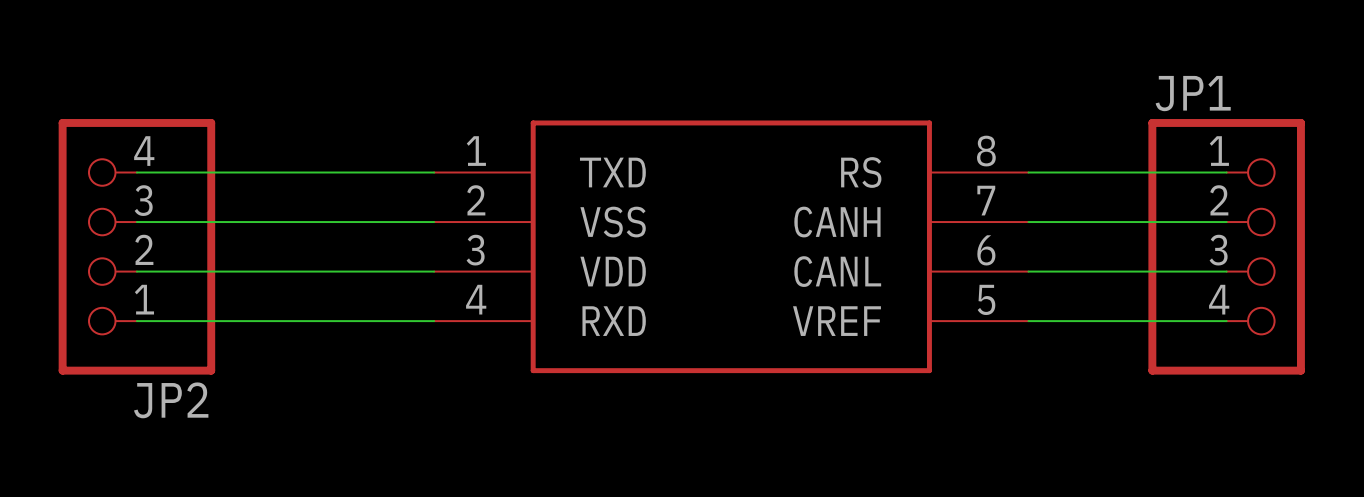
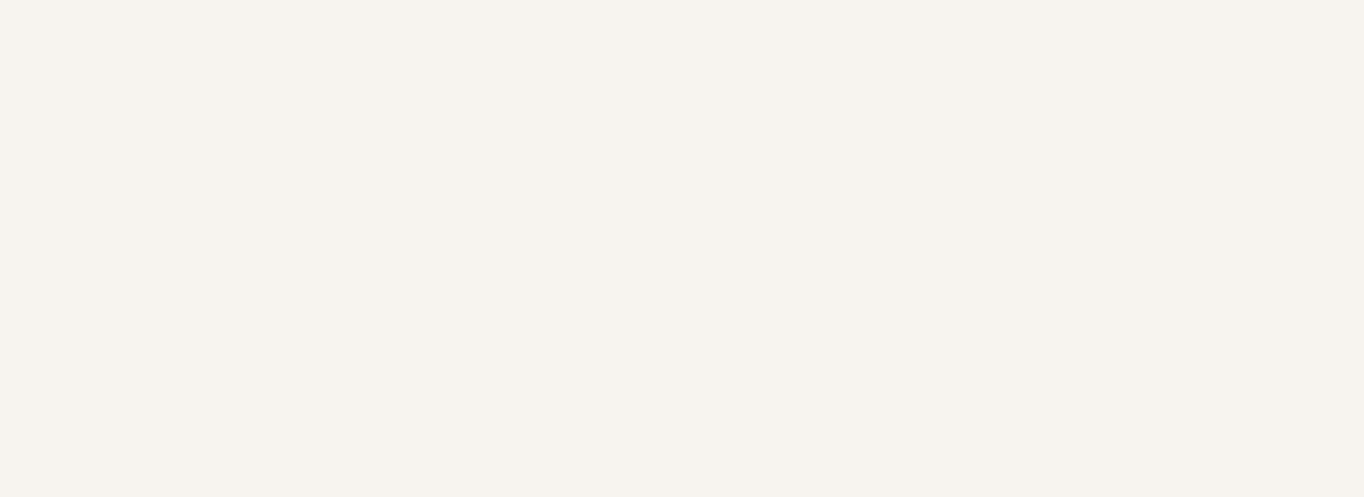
wire: (136, 172) (434, 172) -> none
wire: (1028, 172) (1226, 172) -> none
wire: (136, 222) (434, 222) -> none
wire: (1028, 222) (1226, 222) -> none
JP2: (136, 246) -> none
part: (731, 246) -> none
JP1: (1226, 246) -> none
wire: (136, 271) (434, 271) -> none
wire: (1028, 271) (1226, 271) -> none
wire: (136, 321) (434, 321) -> none
wire: (1028, 321) (1226, 321) -> none

